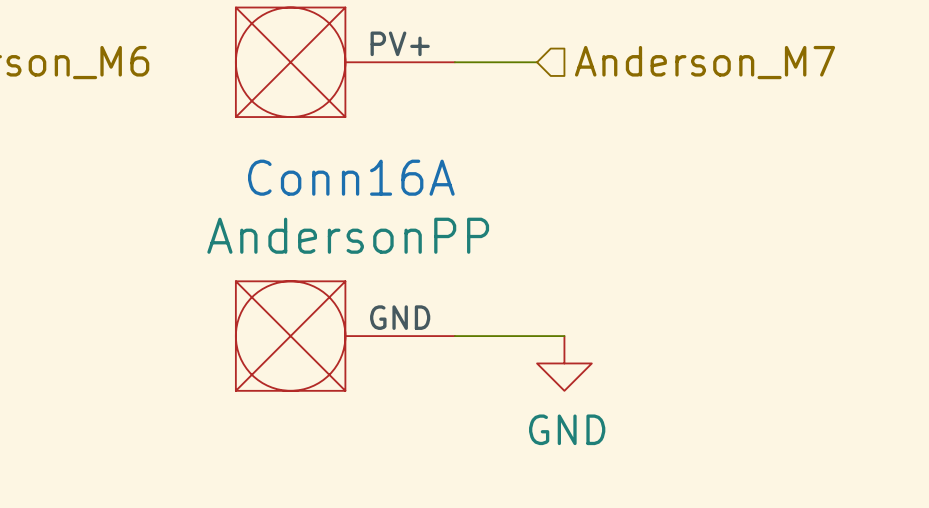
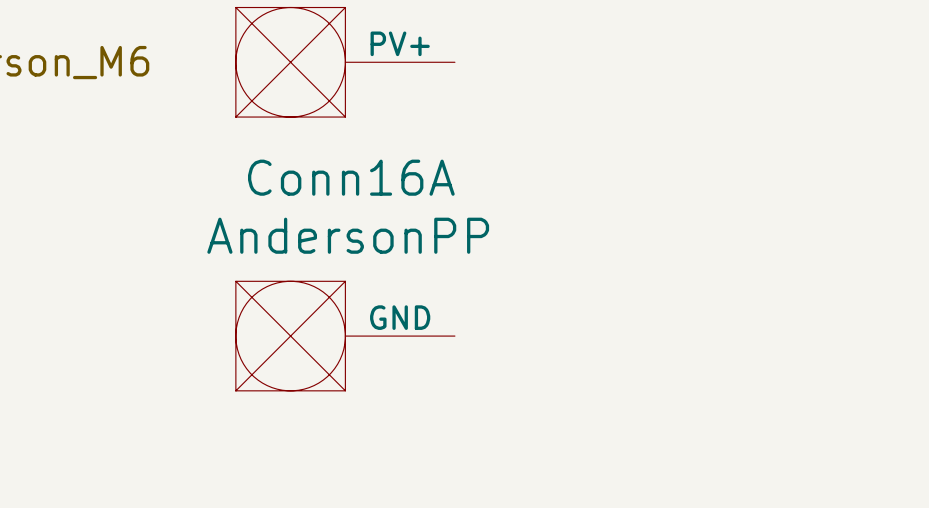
wire: (454, 62) (537, 62) -> none
hierarchical label: Anderson_M7 (705, 62) -> none
wire: (454, 336) (564, 336) -> none
power symbol: GND (564, 363) -> none

